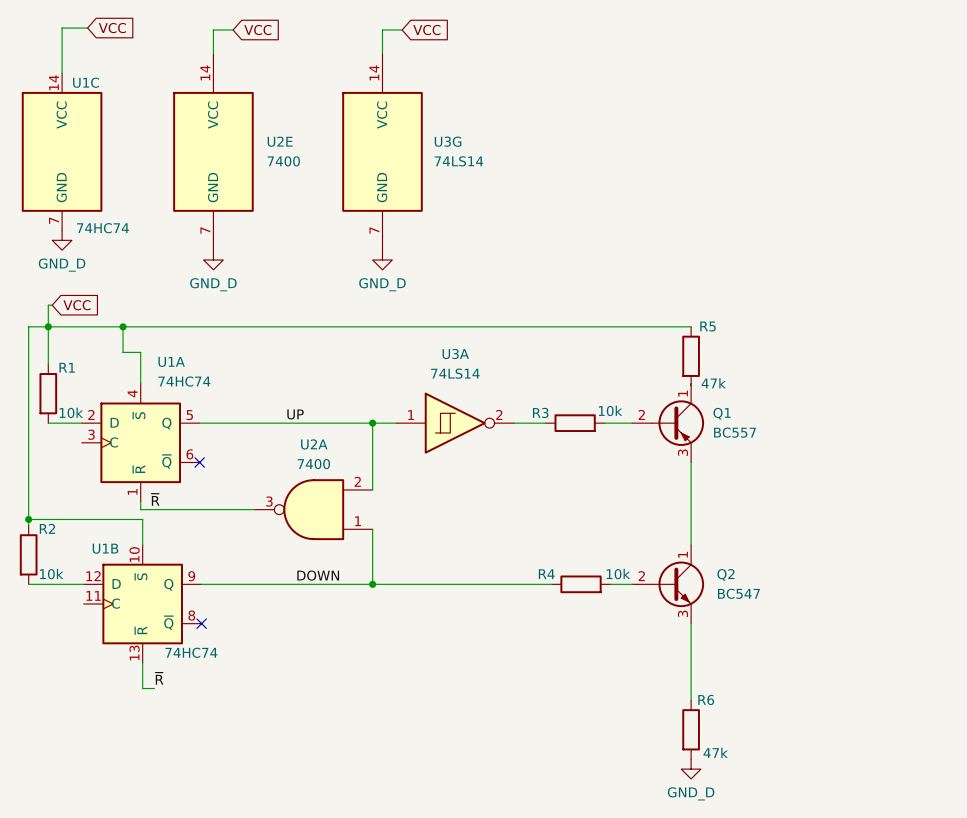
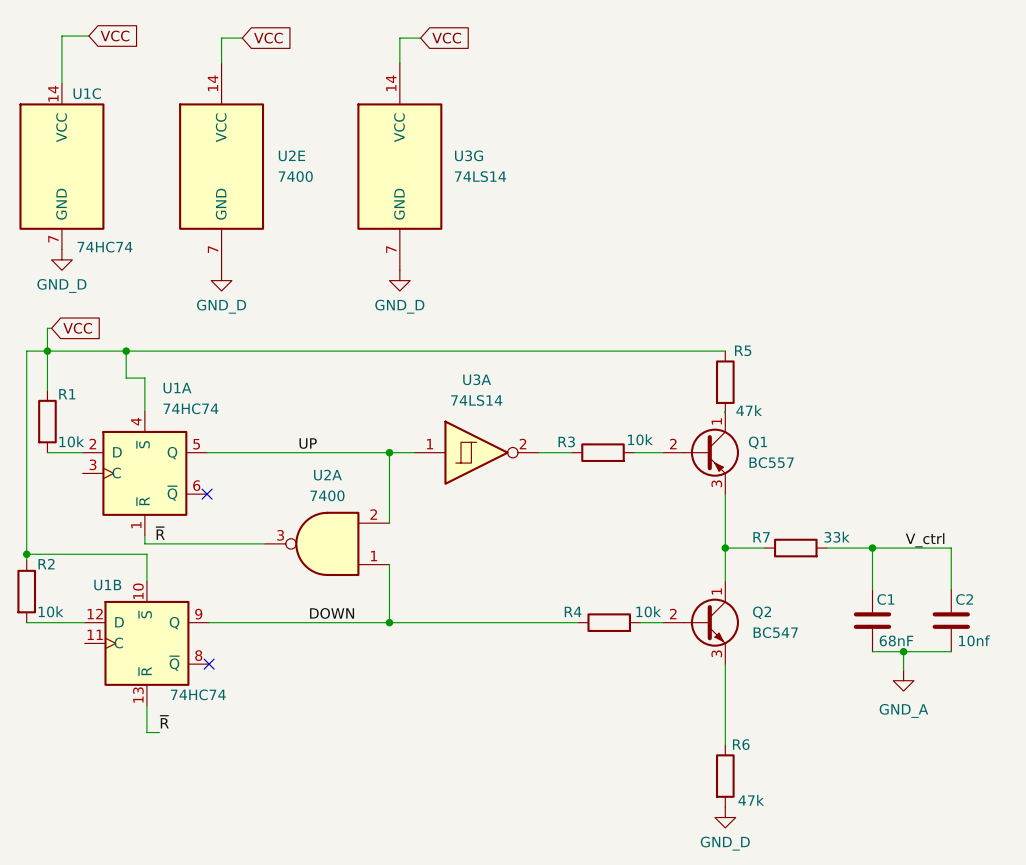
label: none -> V_ctrl (925, 540)
wire: none -> (725, 548) (764, 548)
junction: none -> (725, 548)
R7: none -> 33k (795, 548)
wire: none -> (826, 548) (951, 548) (951, 589)
wire: none -> (872, 548) (872, 589)
junction: none -> (872, 548)
C1: none -> 68nF (872, 620)
C2: none -> 10nf (951, 620)
wire: none -> (872, 651) (951, 651)
wire: none -> (903, 651) (903, 670)
junction: none -> (903, 651)
power symbol: none -> GND_A (903, 680)

